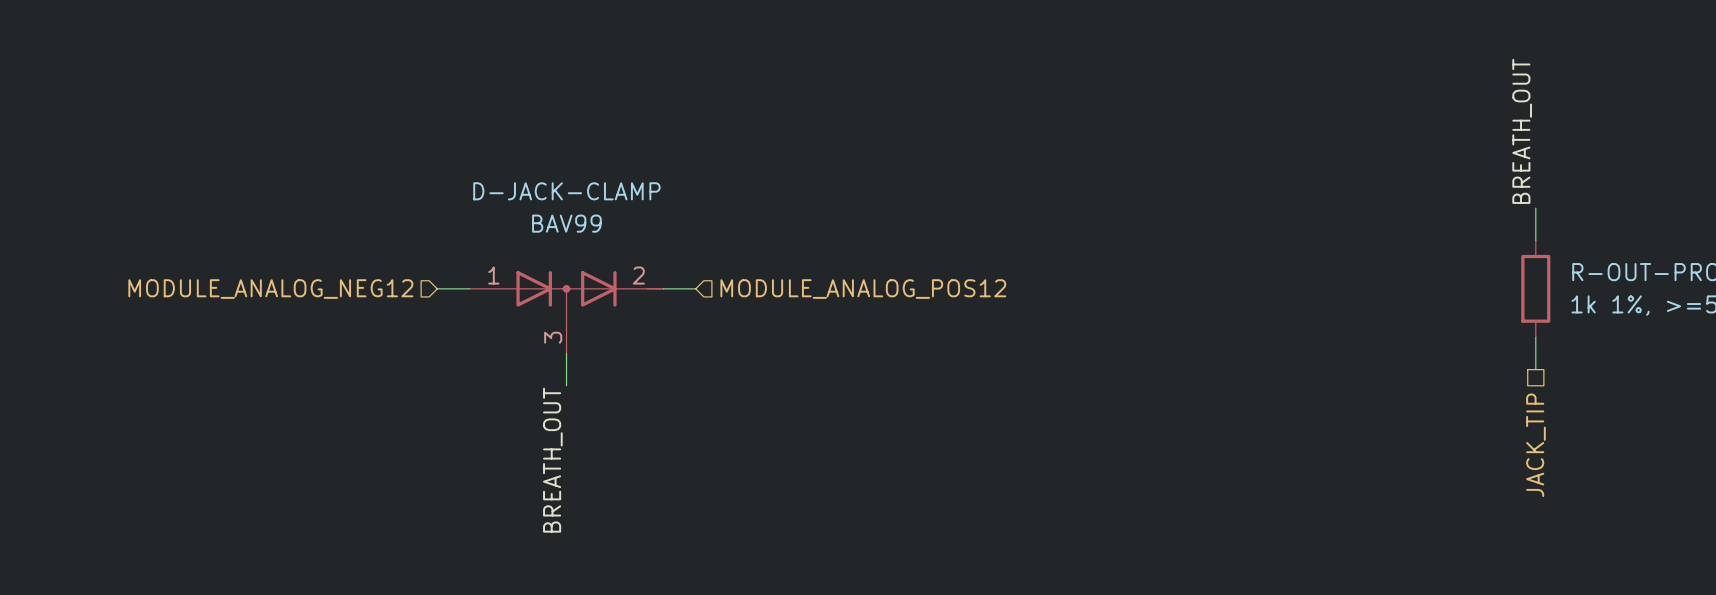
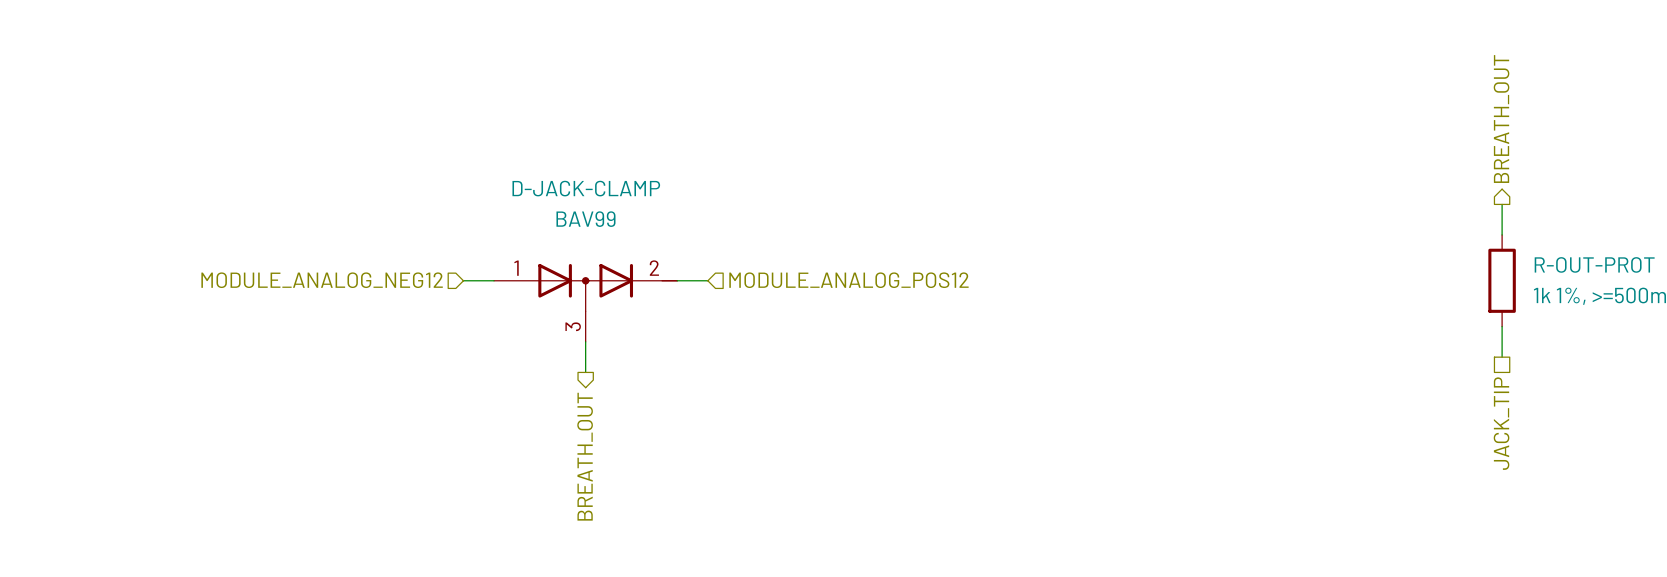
hierarchical label: none -> BREATH_OUT (1501, 119)
label: BREATH_OUT (1522, 131) -> none
label: BREATH_OUT (552, 460) -> none
hierarchical label: none -> BREATH_OUT (585, 456)

